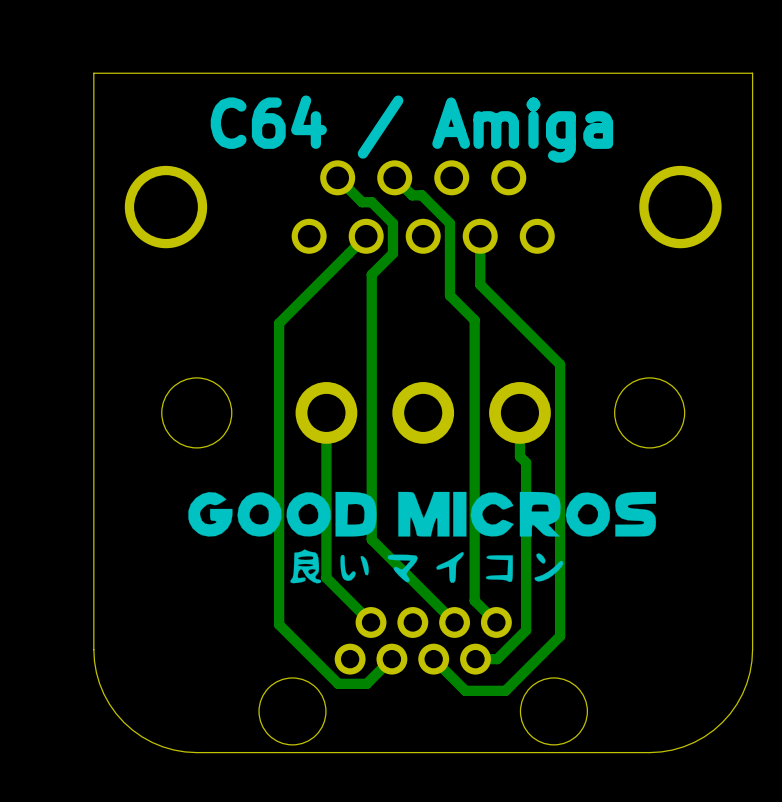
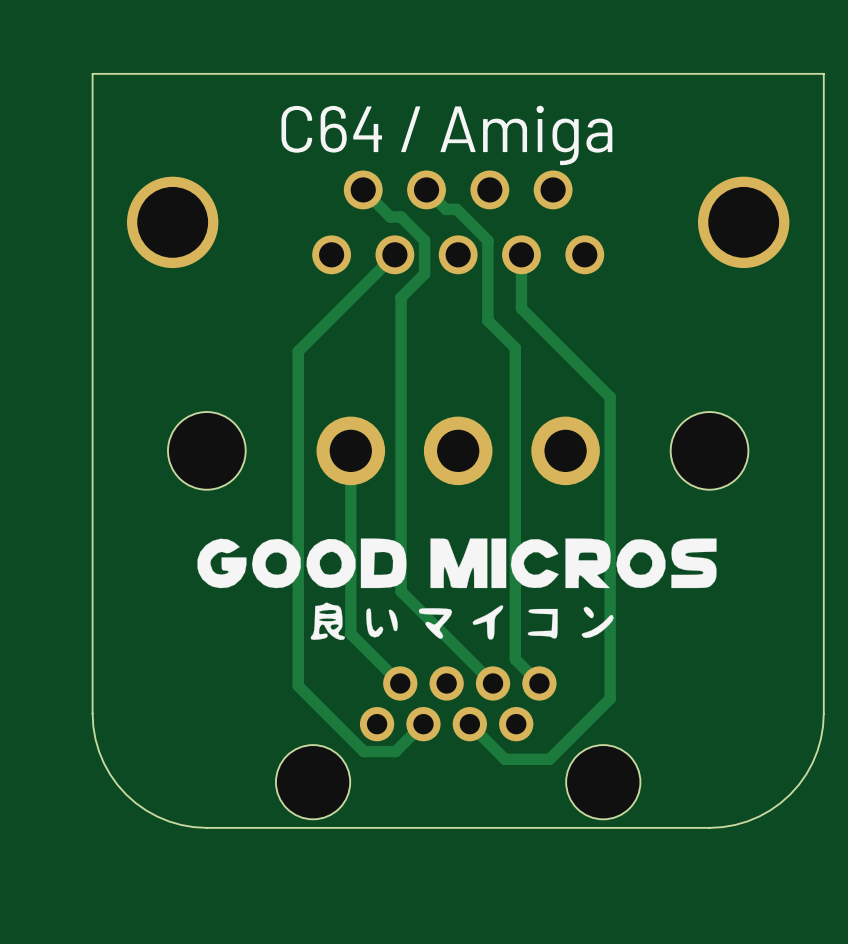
track: (519, 412) (519, 456) (526, 462) (526, 630) (497, 659) (475, 659) -> none

